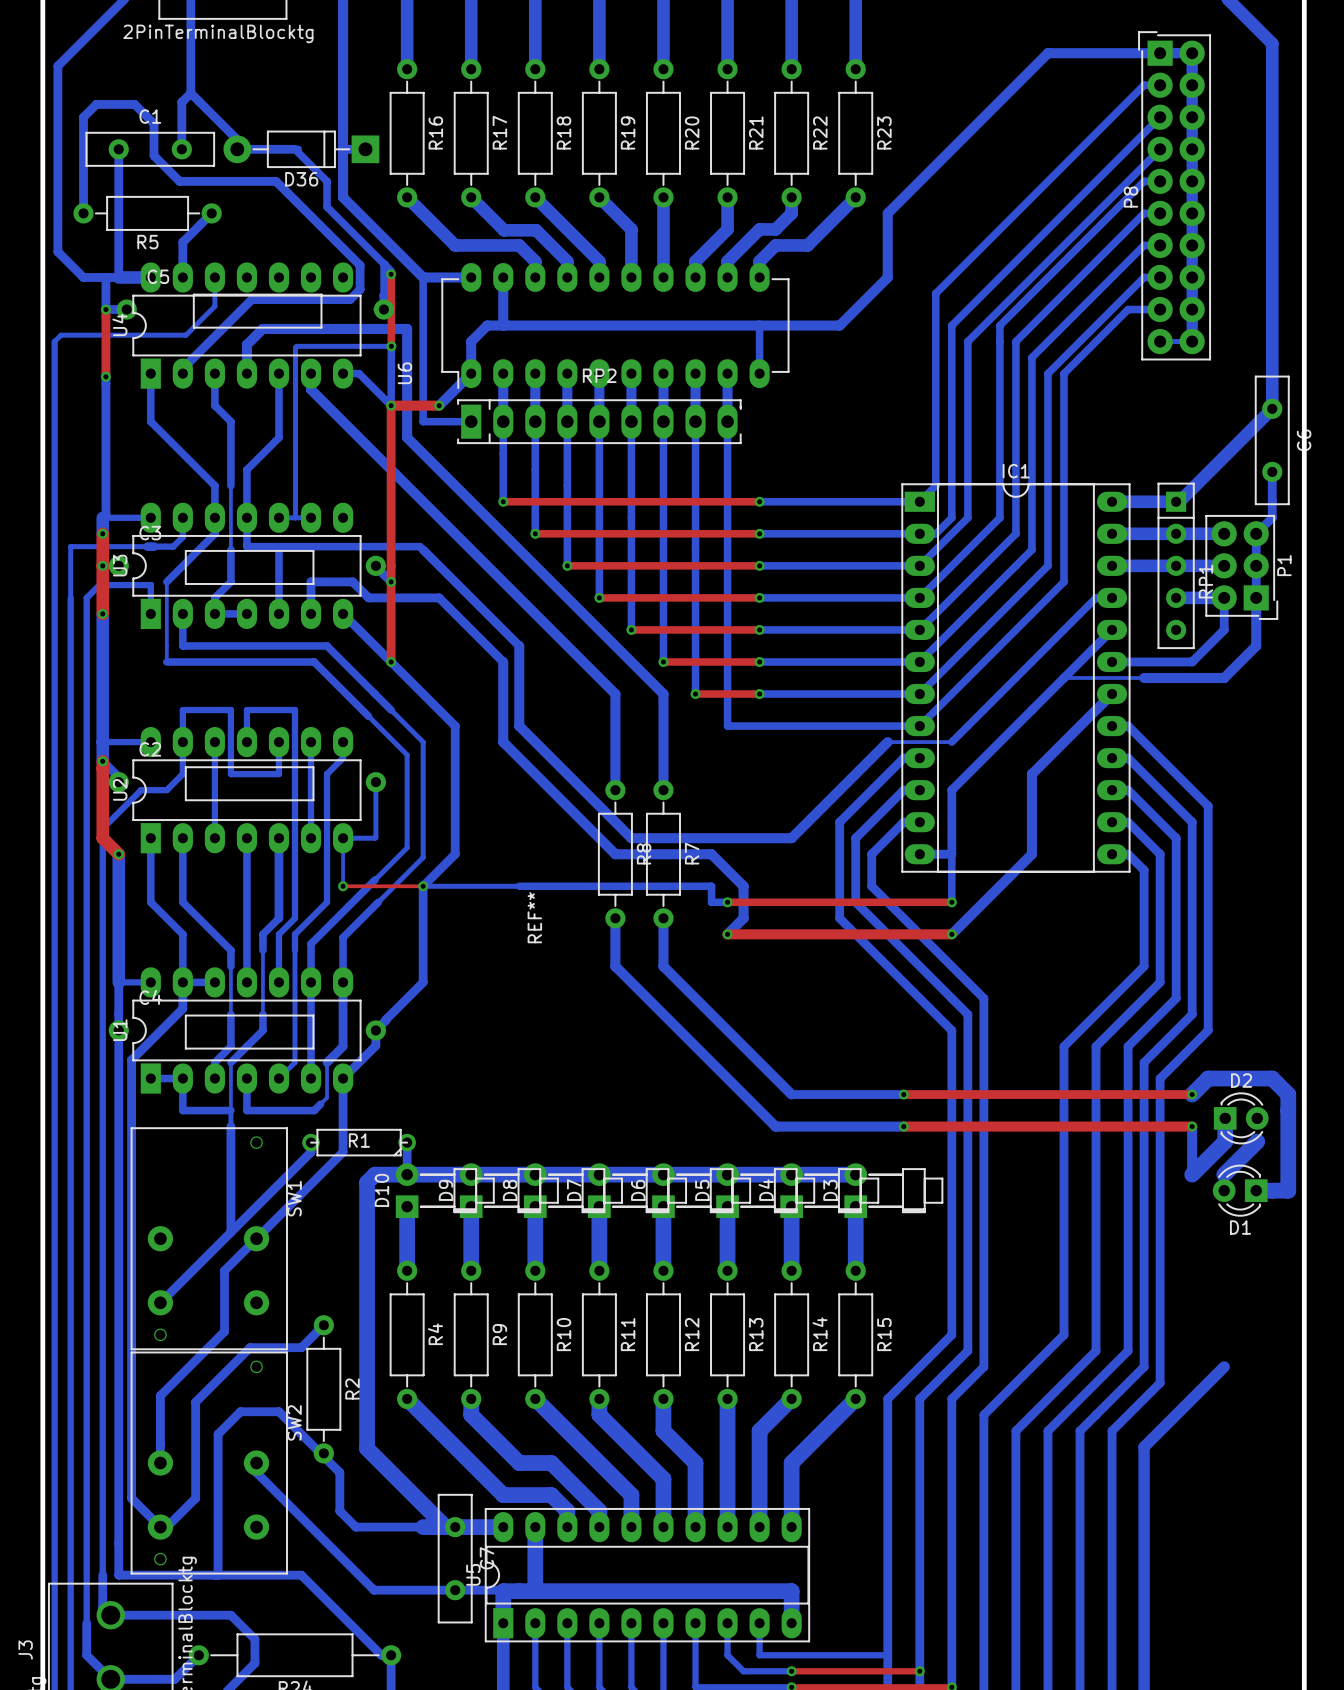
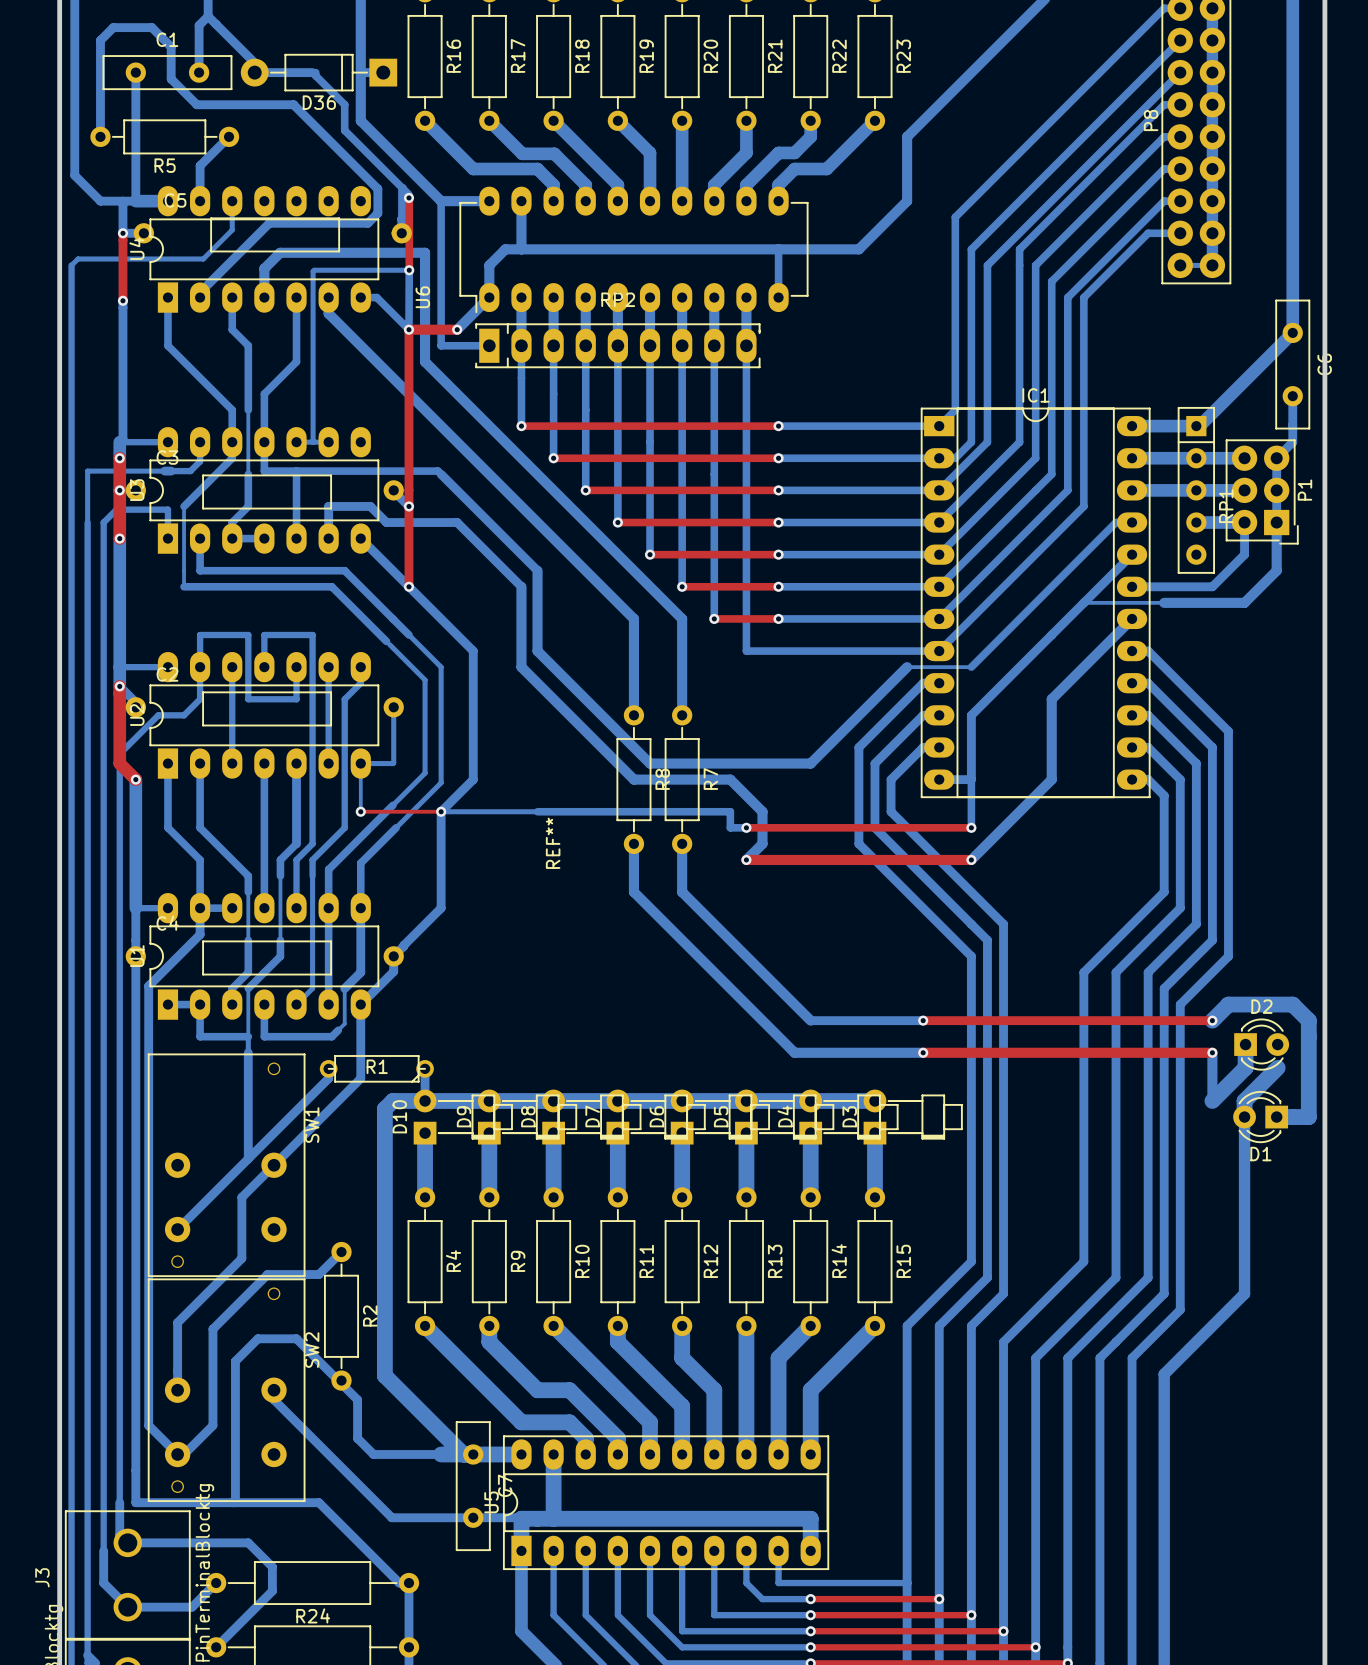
bottom track: none -> (1244, 1100) (1244, 1293)

